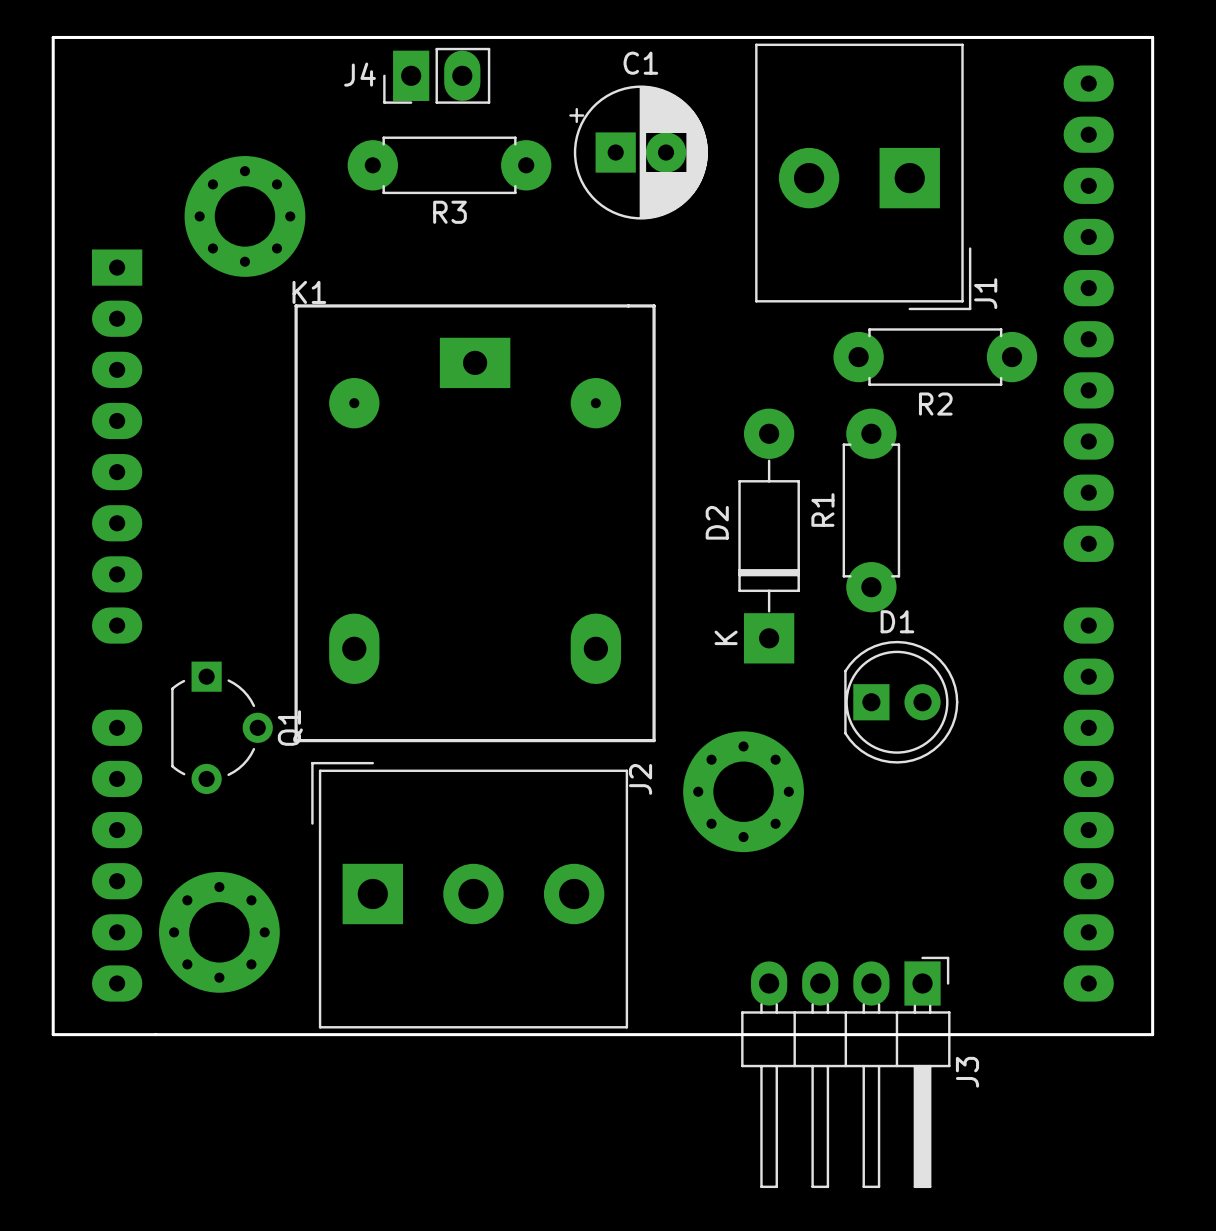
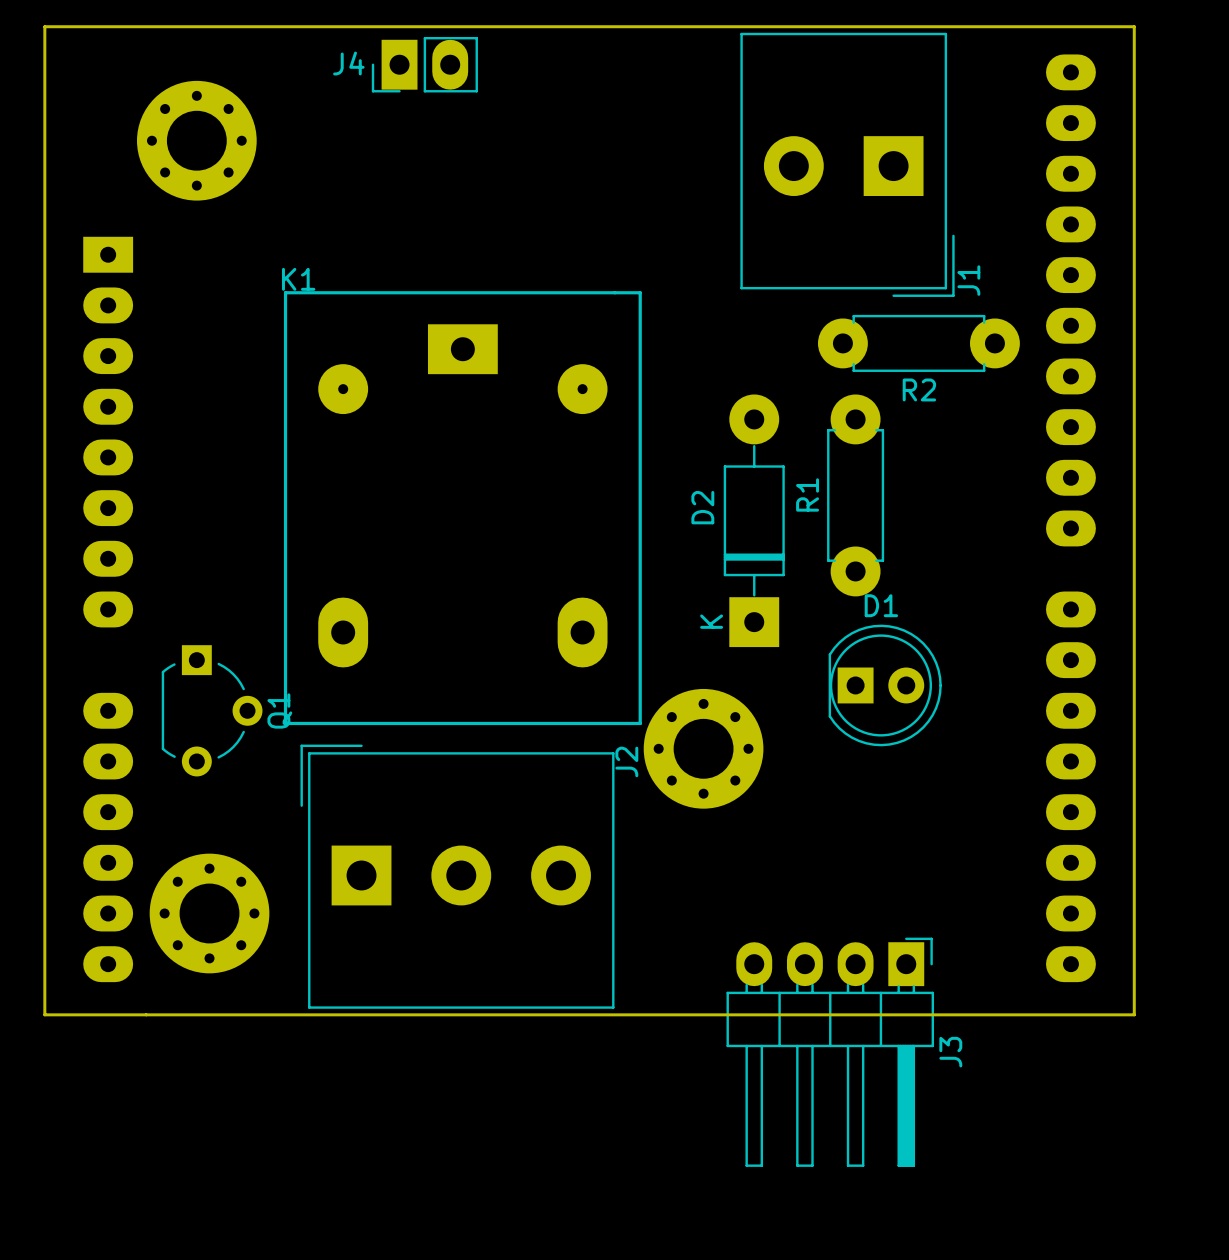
C1: (638, 152) -> none
R3: (449, 165) -> none
part position: (244, 216) -> (196, 140)
part position: (743, 791) -> (703, 748)

